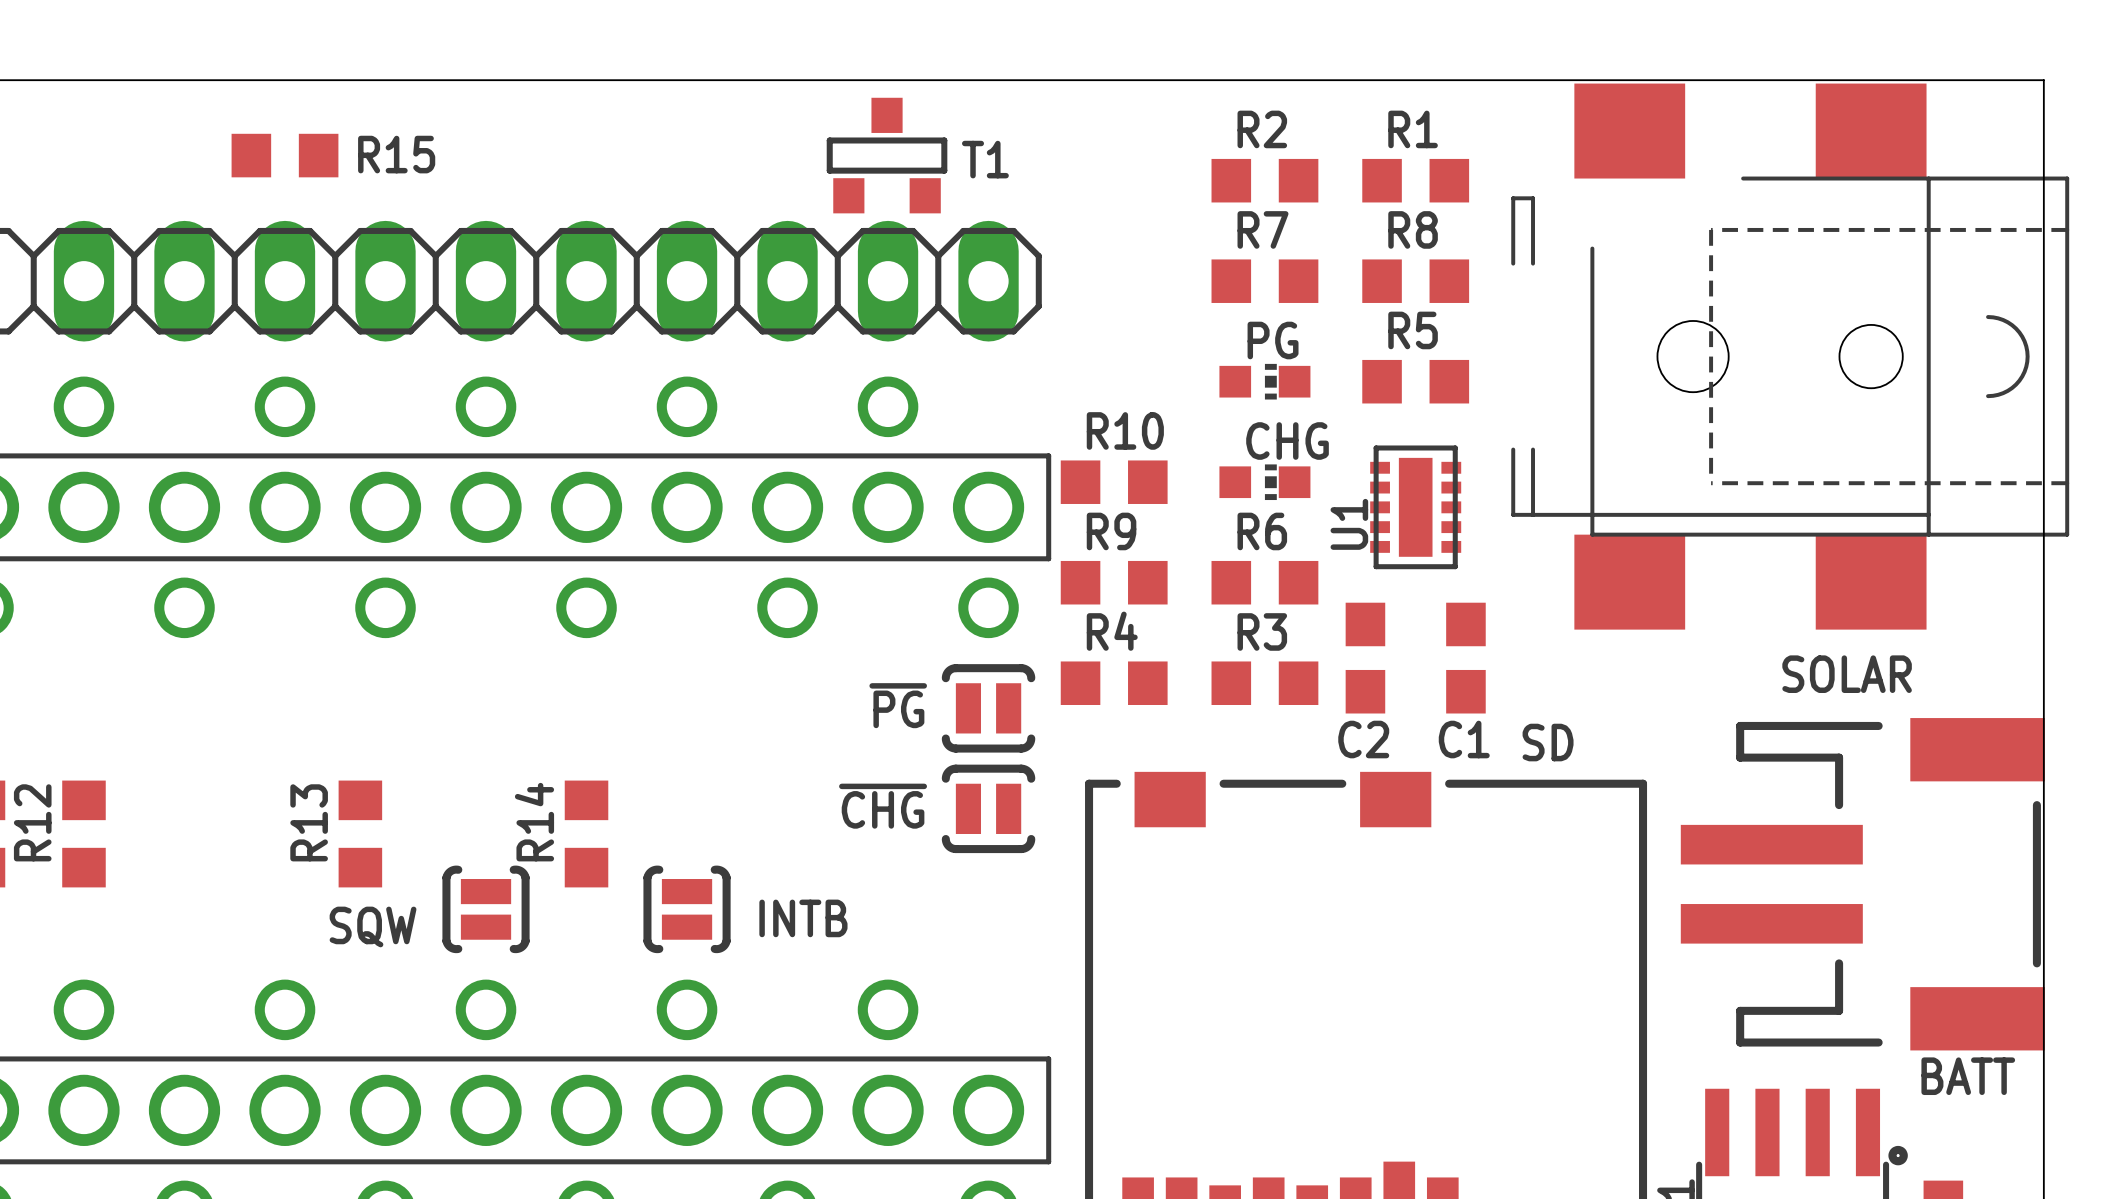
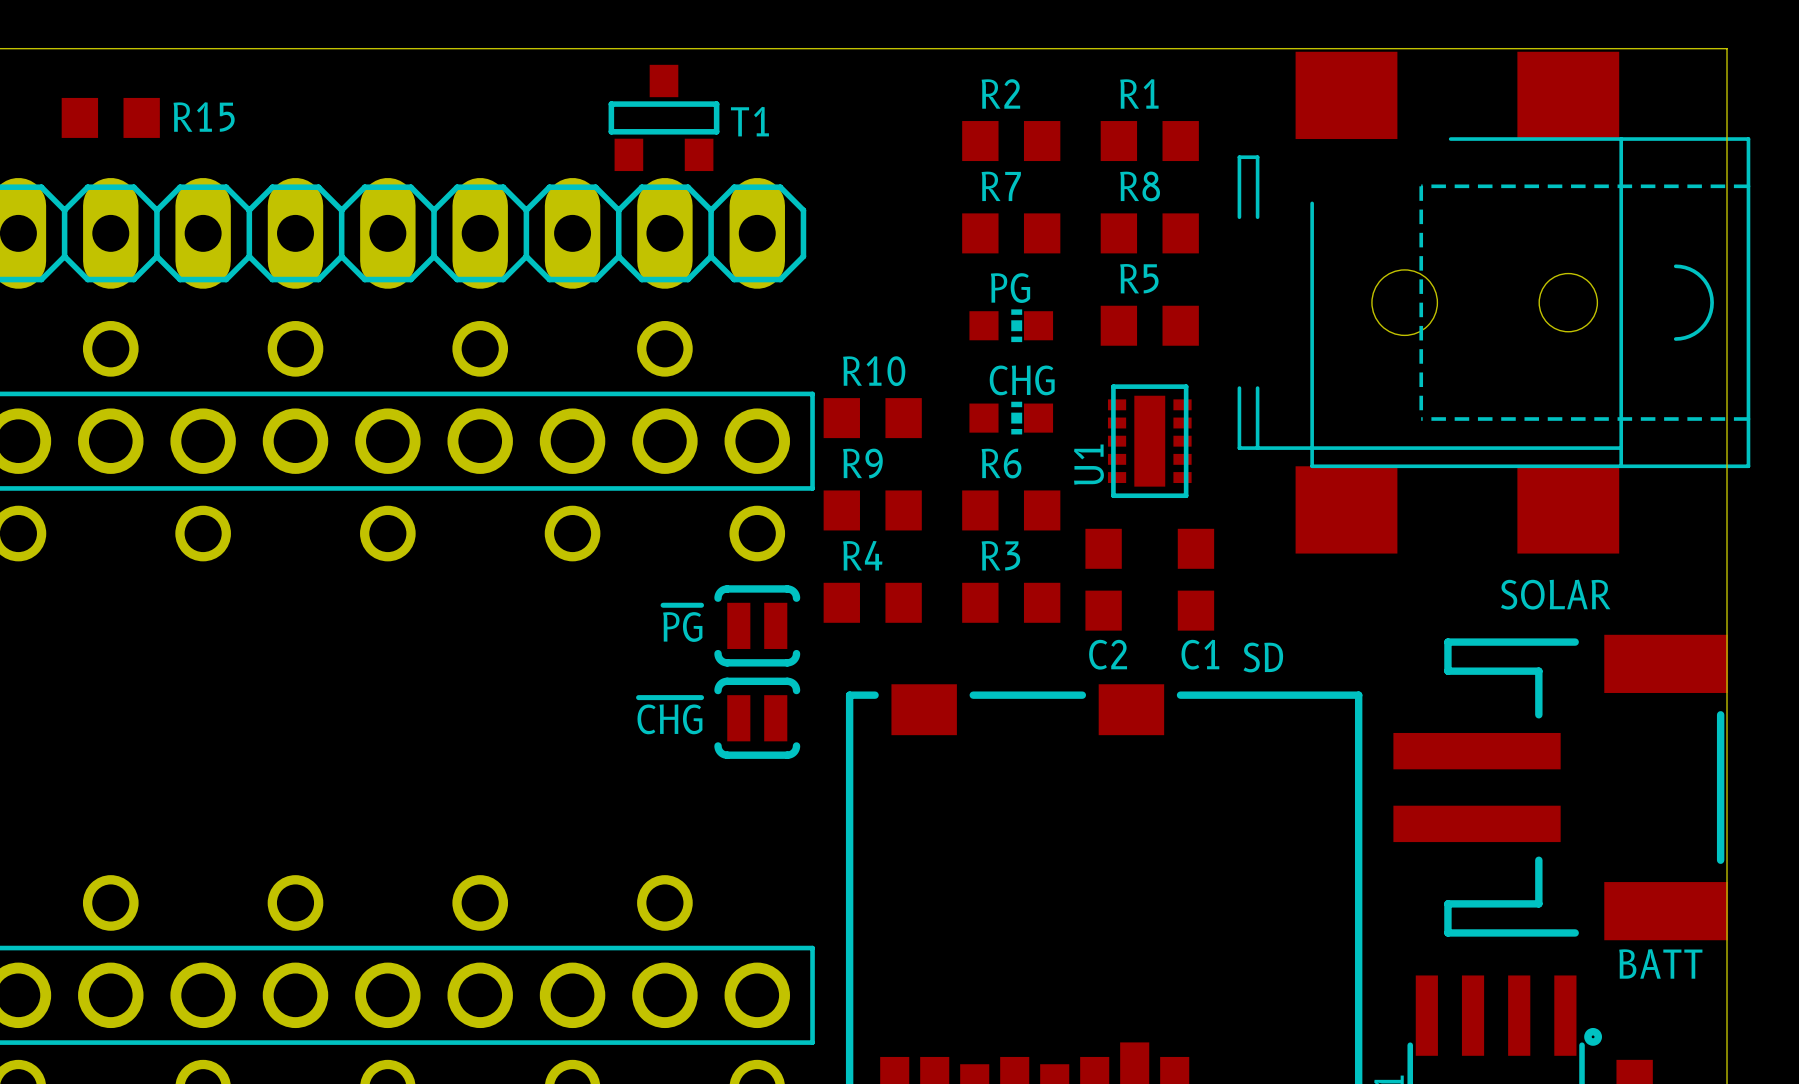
R13: (360, 833) -> none
R14: (586, 833) -> none
SQW: (486, 909) -> none
INTB: (687, 909) -> none

